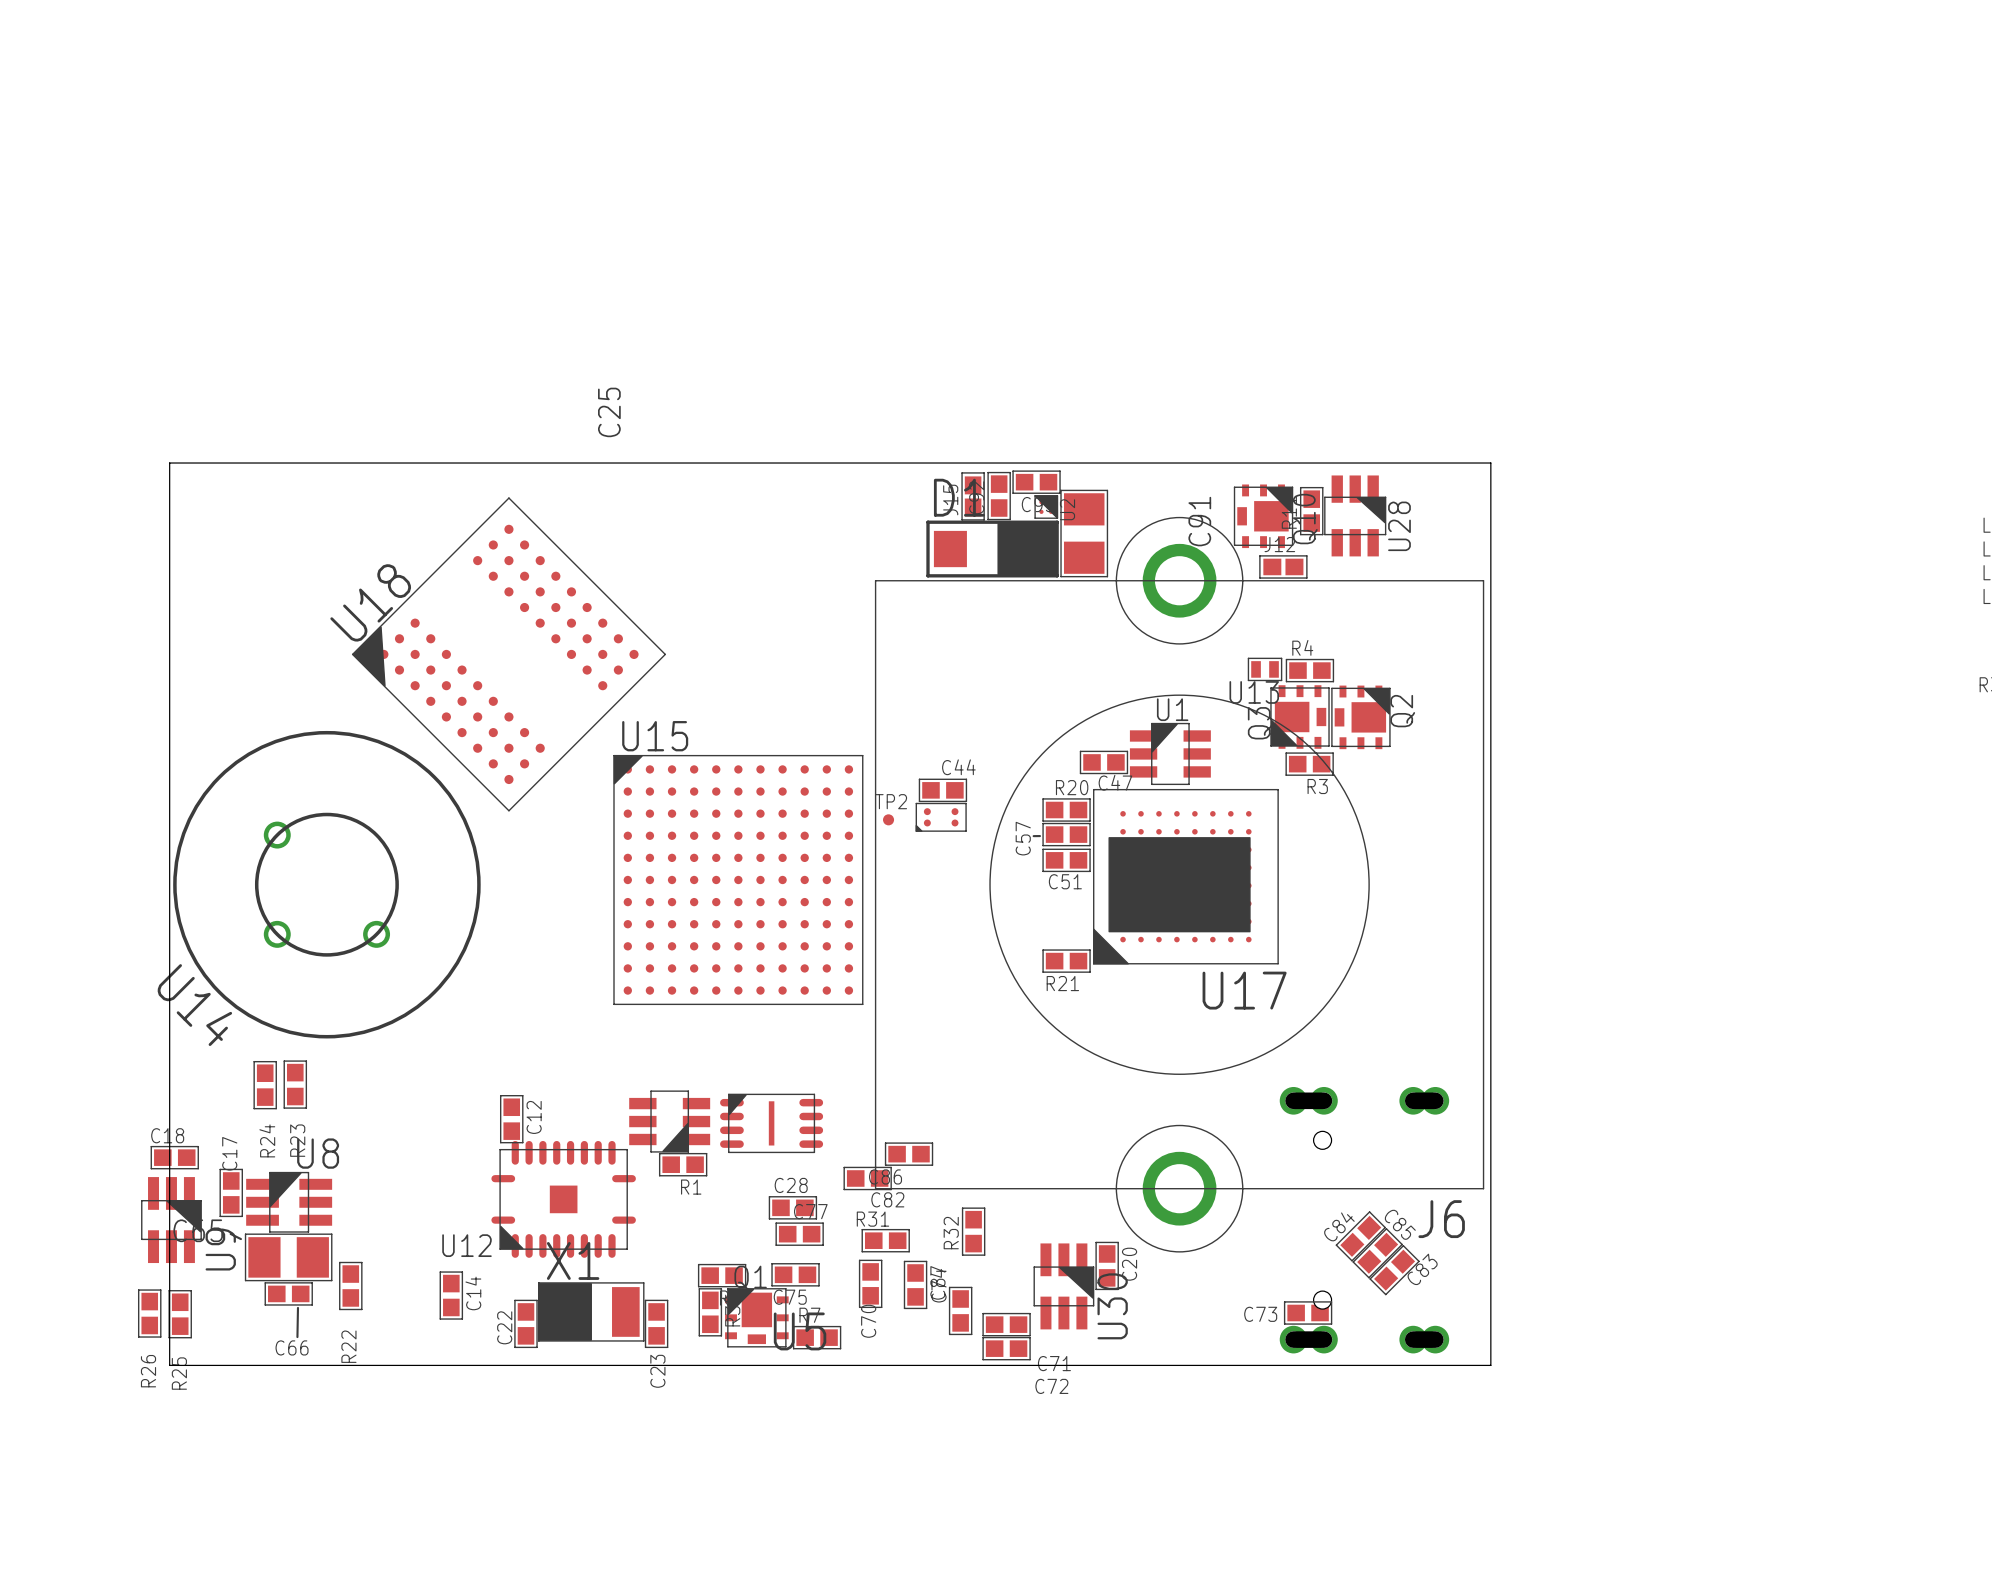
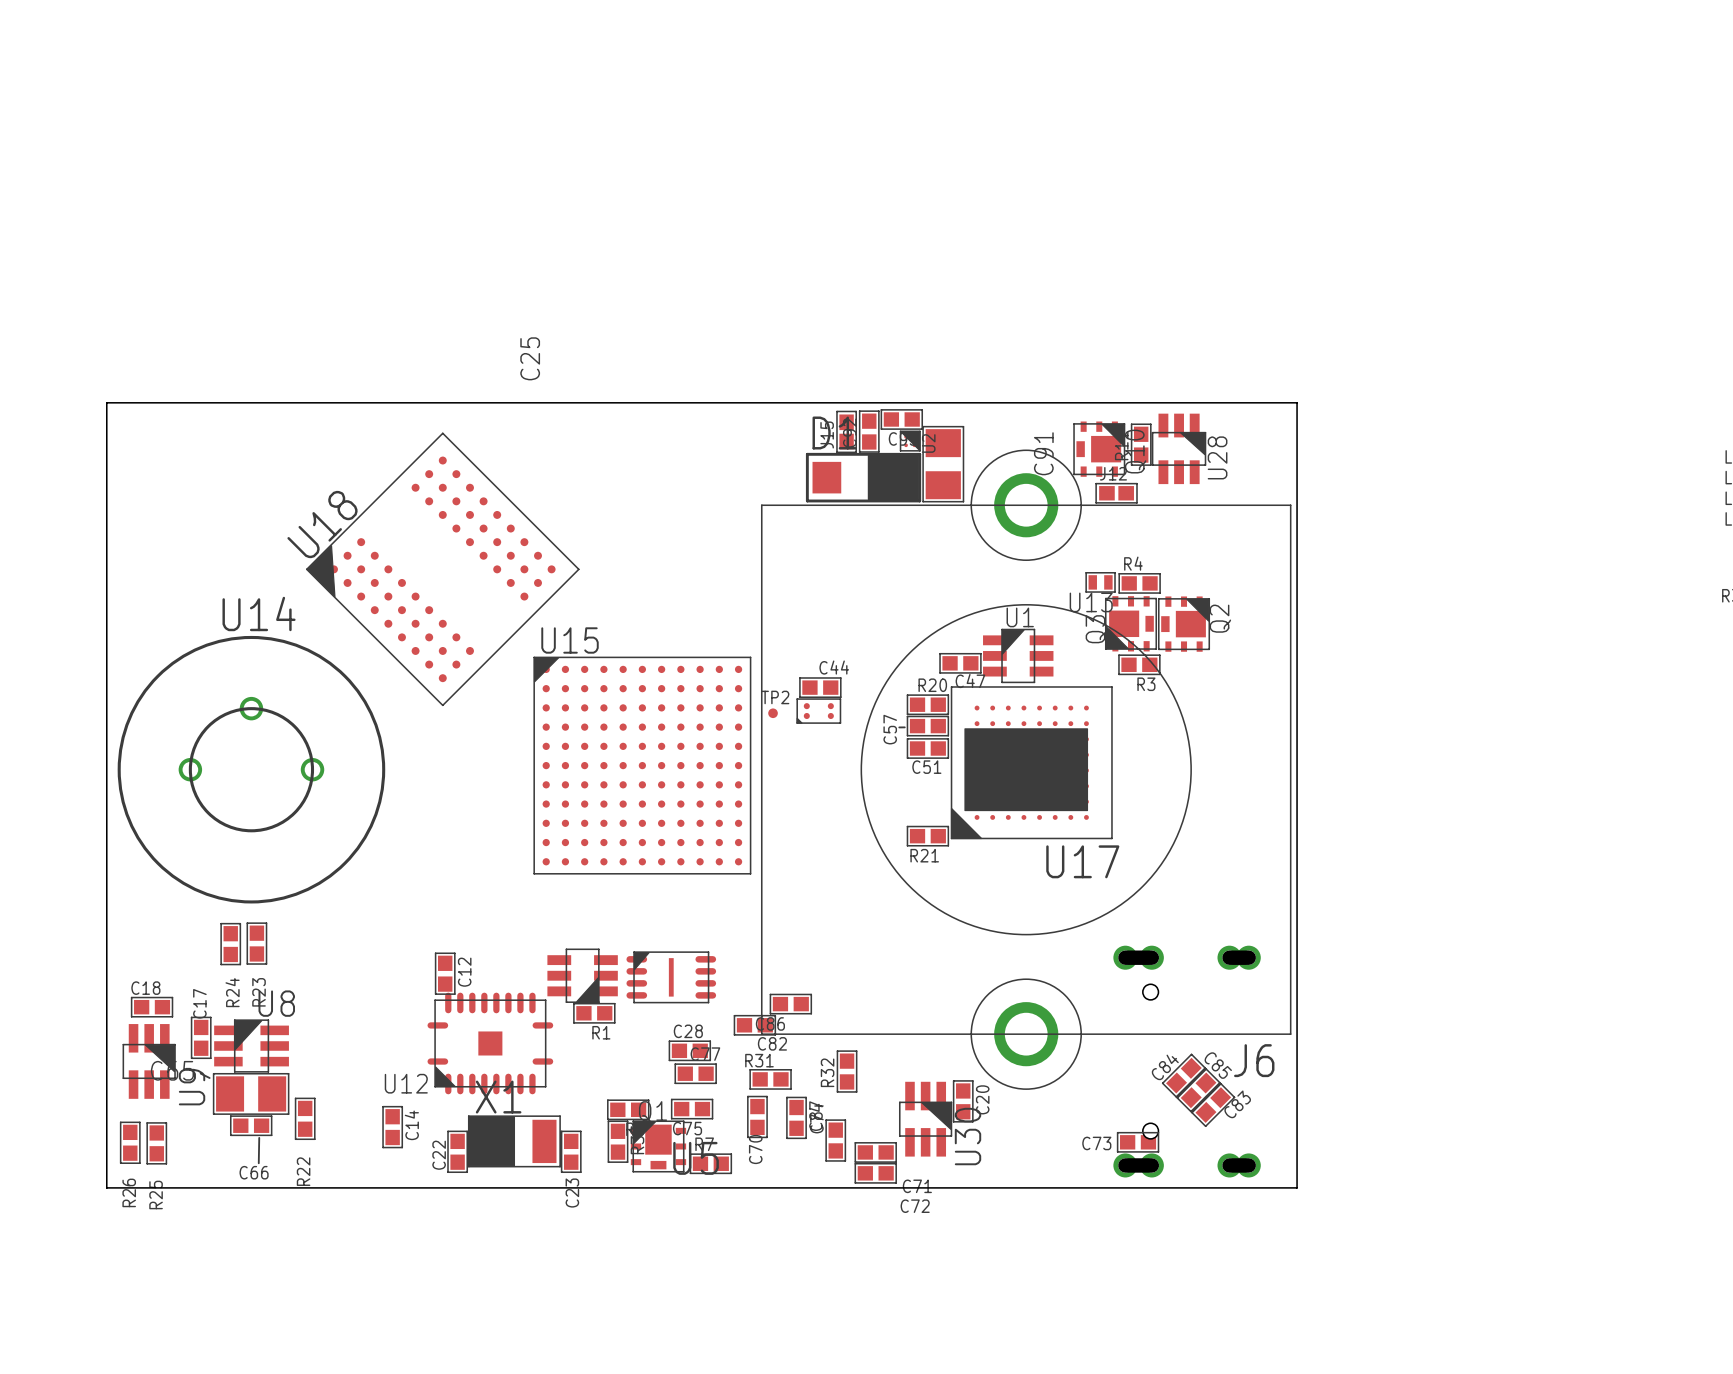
board edge: (169, 463) (169, 1365) -> (147, 402) (106, 402) (106, 1187) (147, 1187)
U14 rotation: 0° (326, 884) -> 135° clockwise (251, 769)

